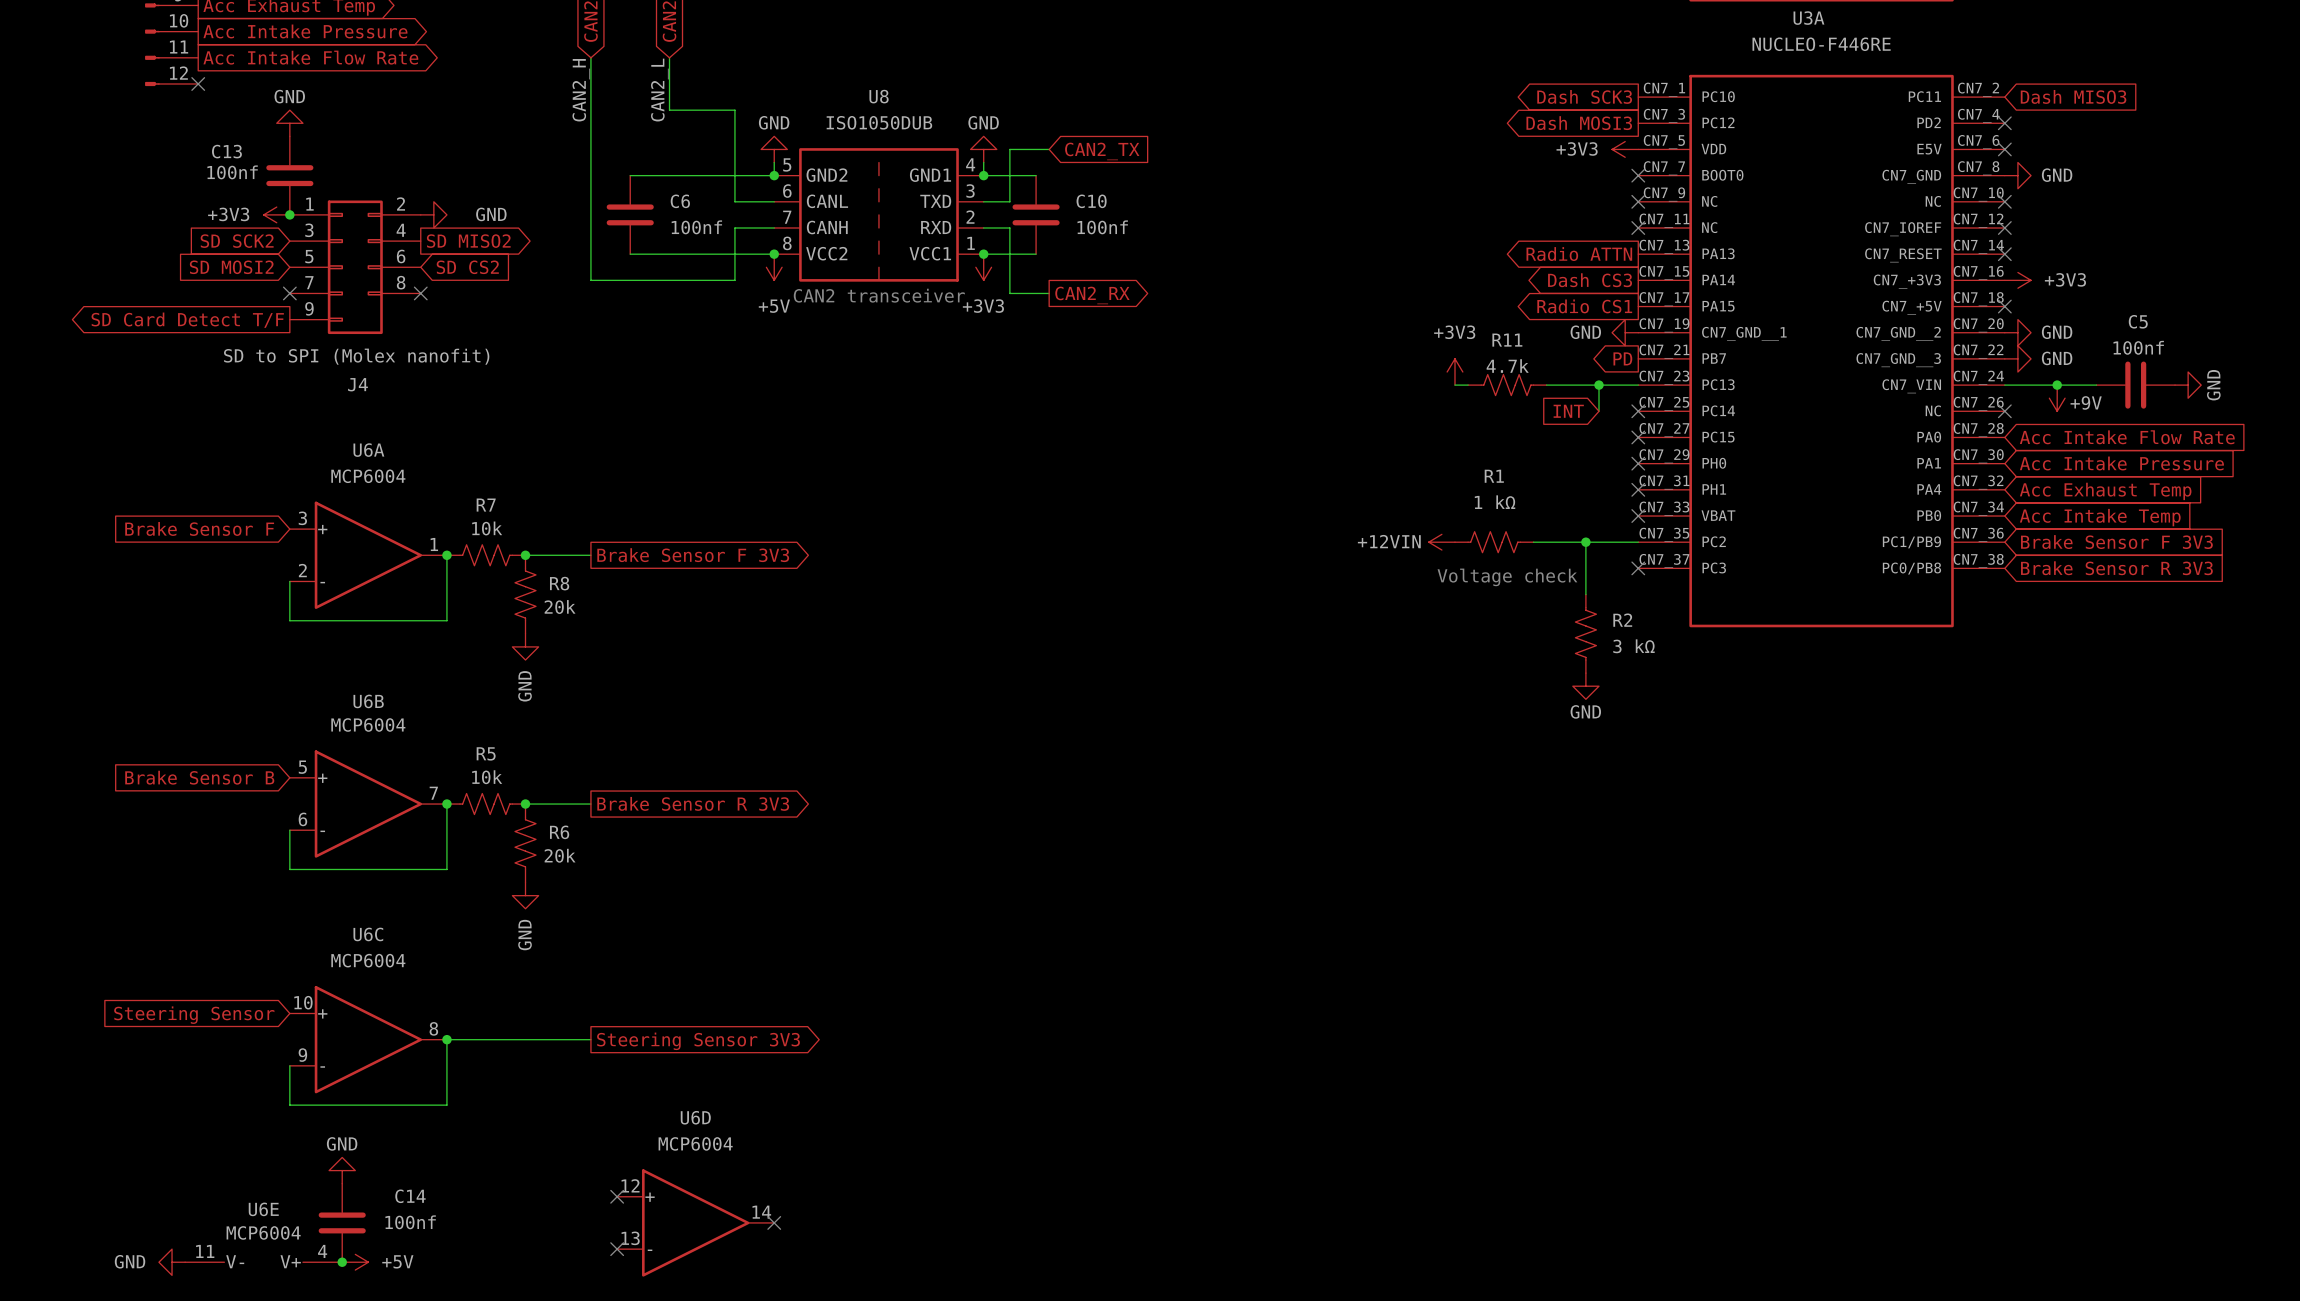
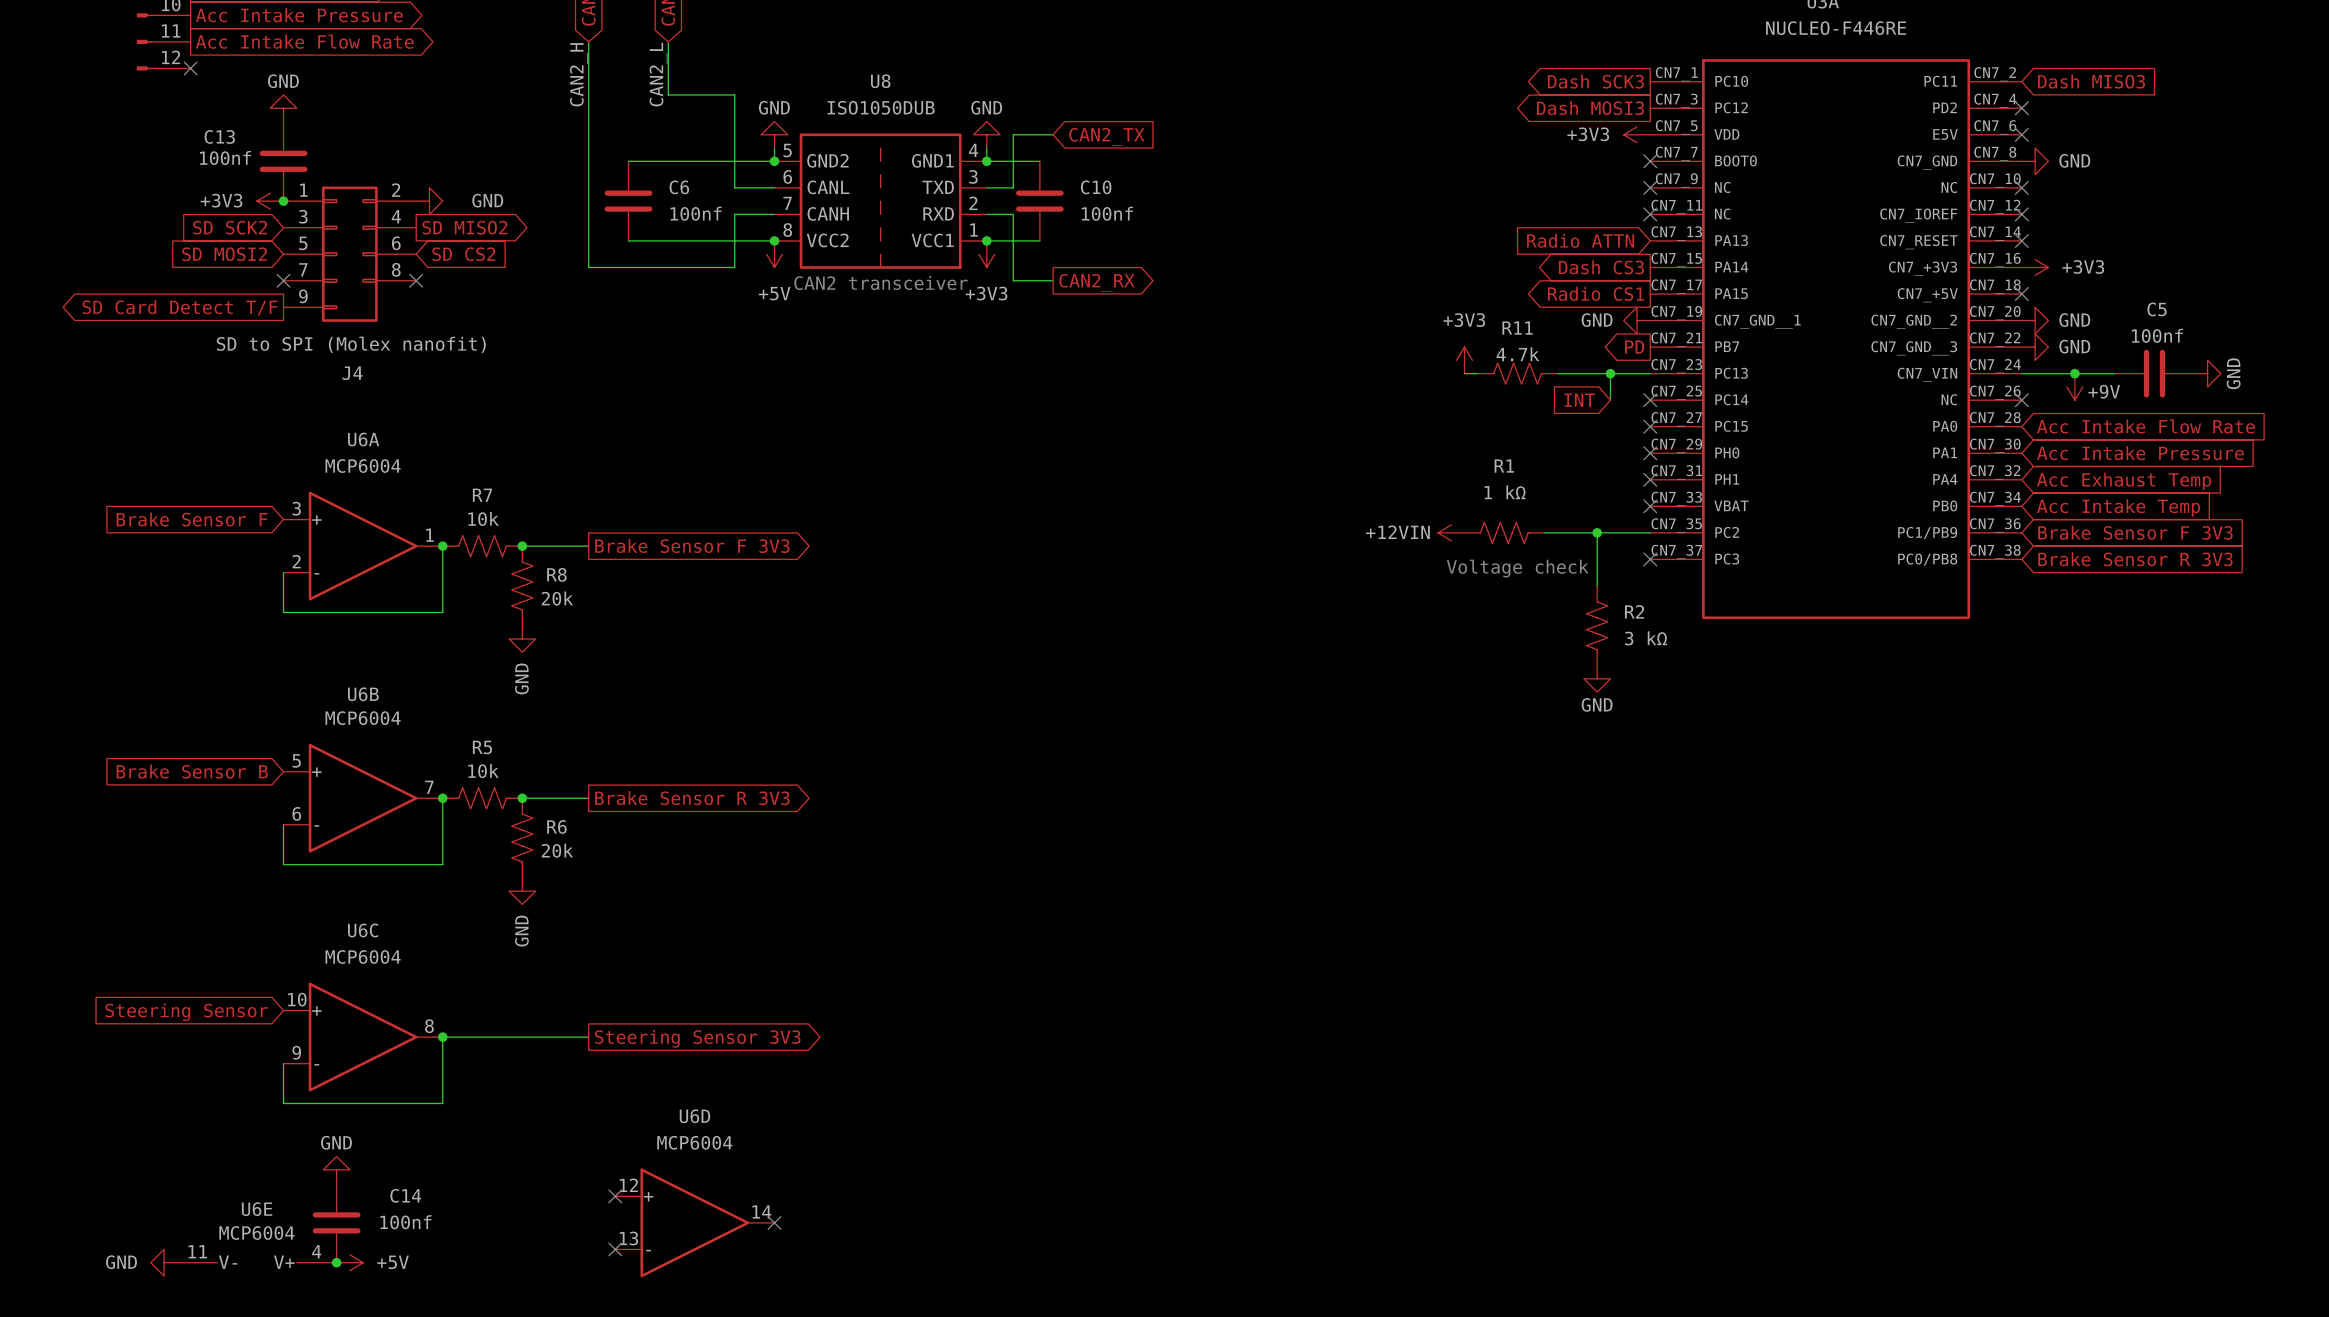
global label shape: output (1579, 254) -> input (1580, 240)

